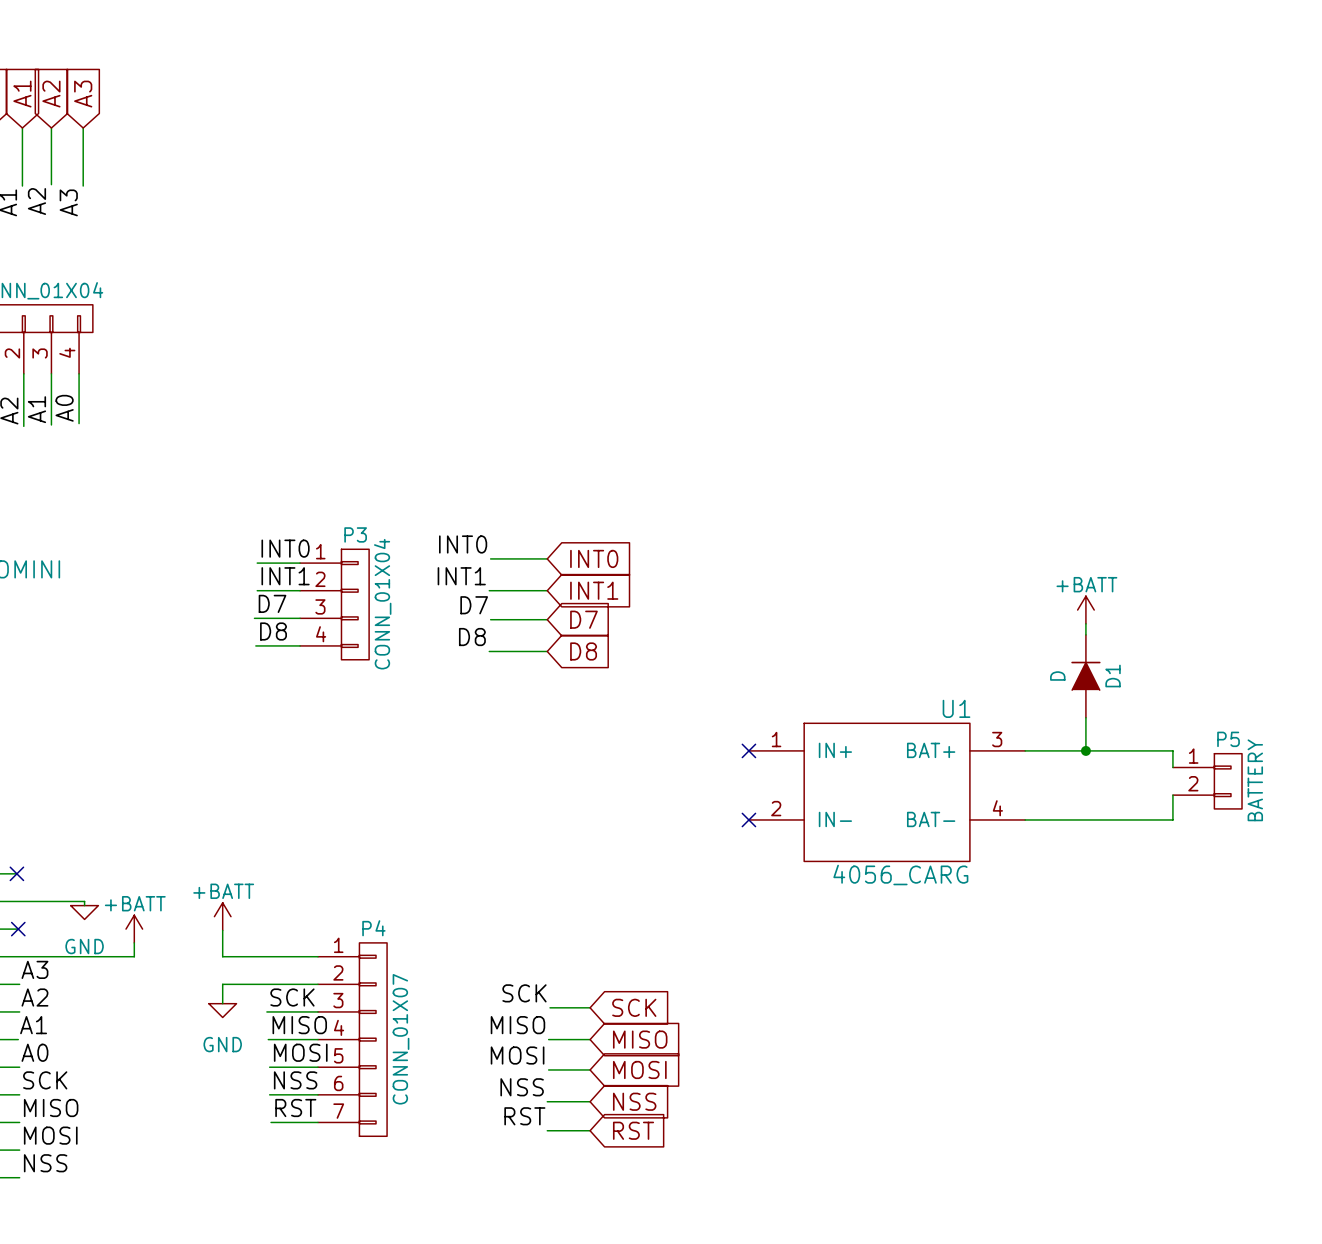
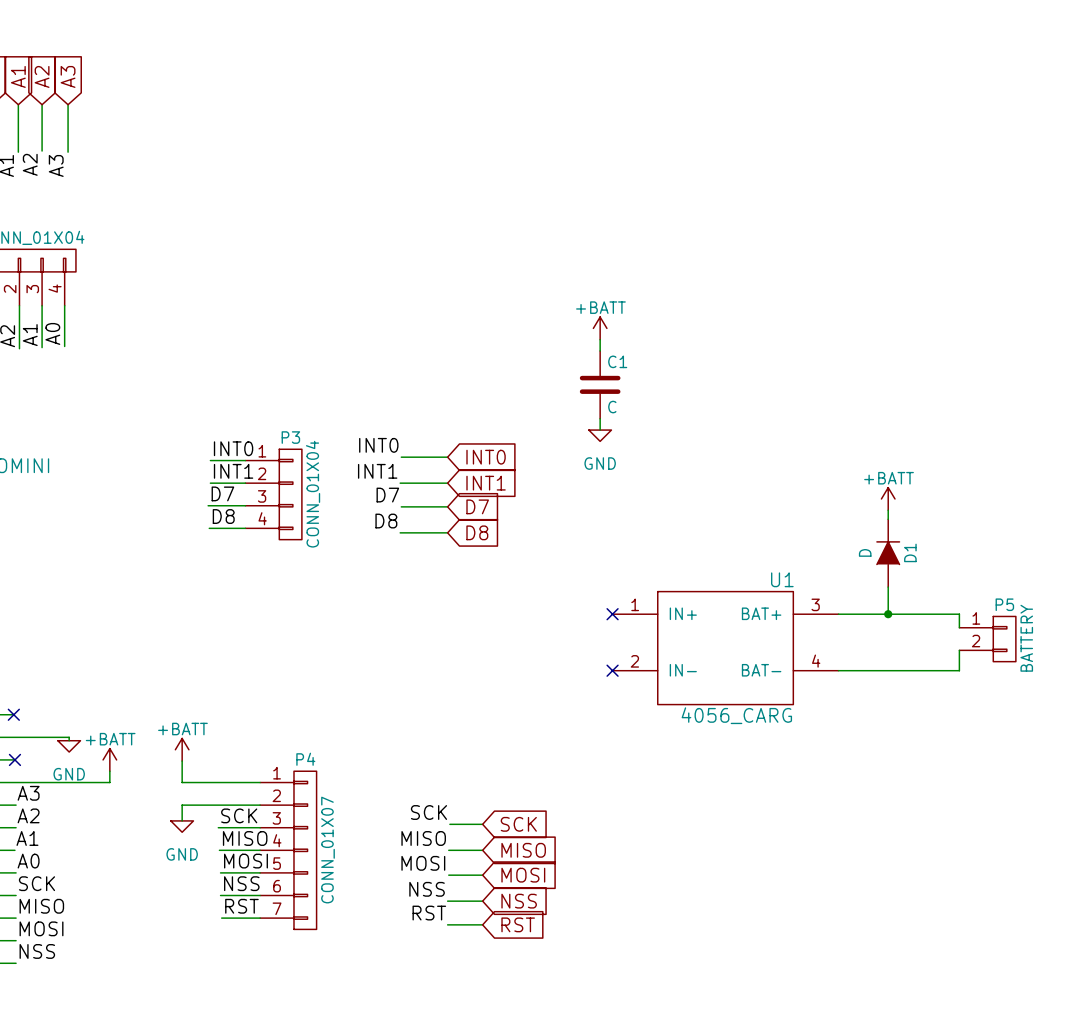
power symbol: none -> +BATT (600, 328)
wire: none -> (600, 339) (600, 350)
C1: none -> C (600, 384)
wire: none -> (600, 418) (600, 430)
power symbol: none -> GND (600, 435)

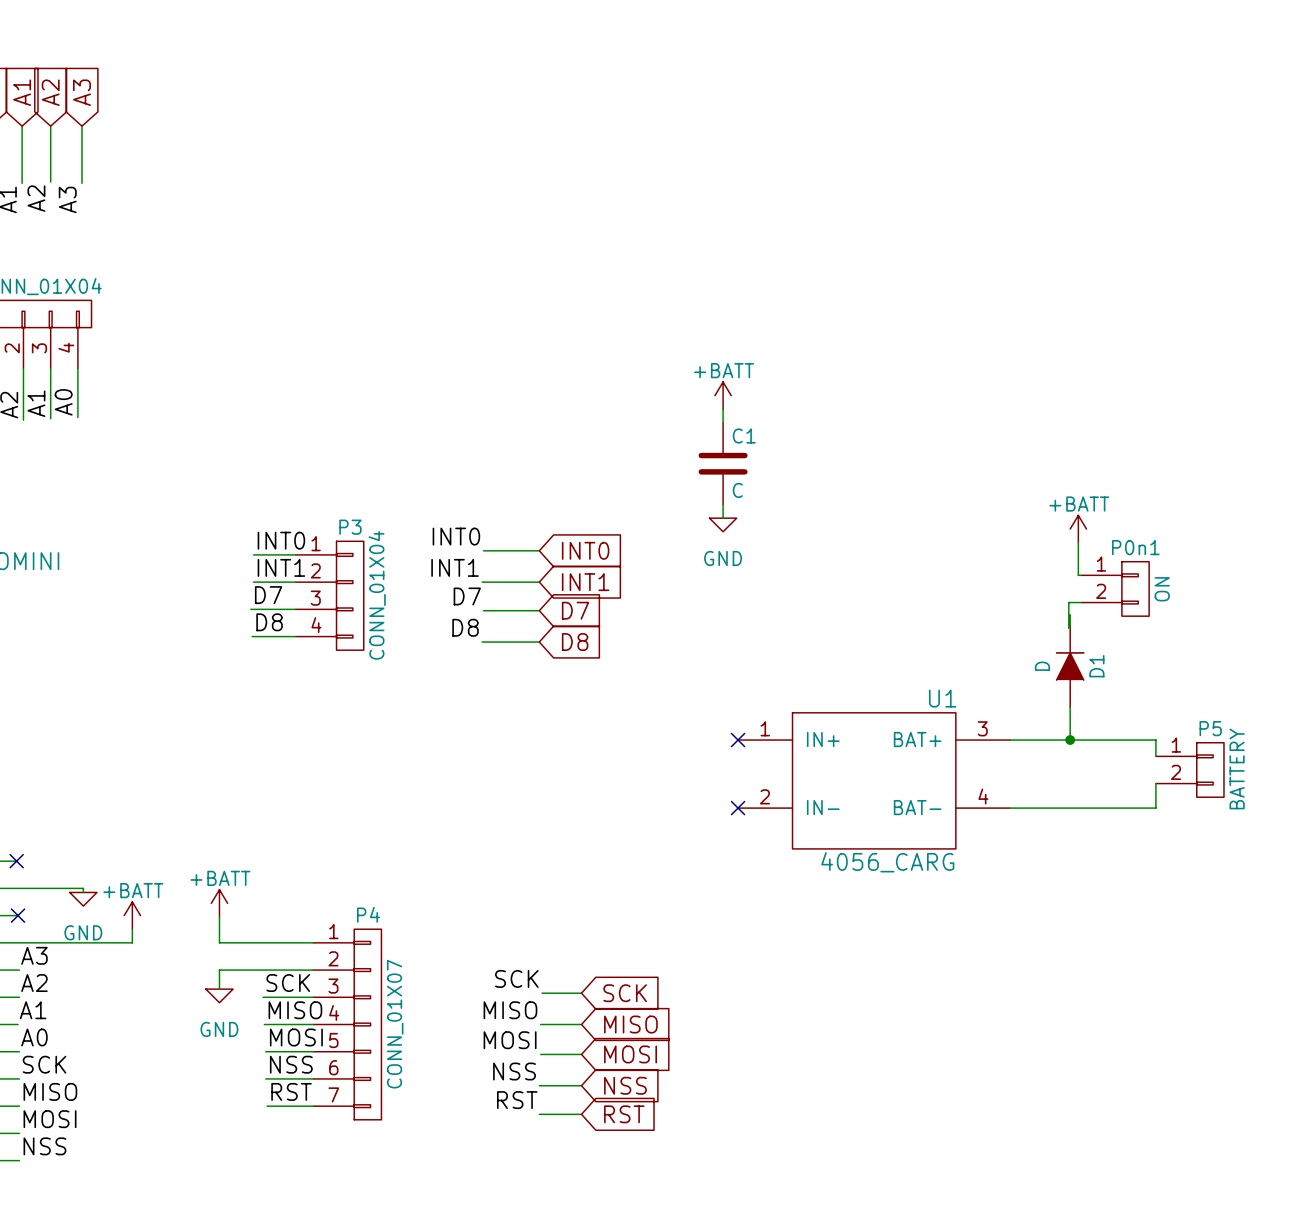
wire: none -> (1078, 542) (1078, 575) (1081, 575)
P0n1: none -> ON (1115, 588)
power symbol position: +BATT (888, 498) -> +BATT (1078, 529)
wire: none -> (1081, 602) (1068, 602) (1068, 628)

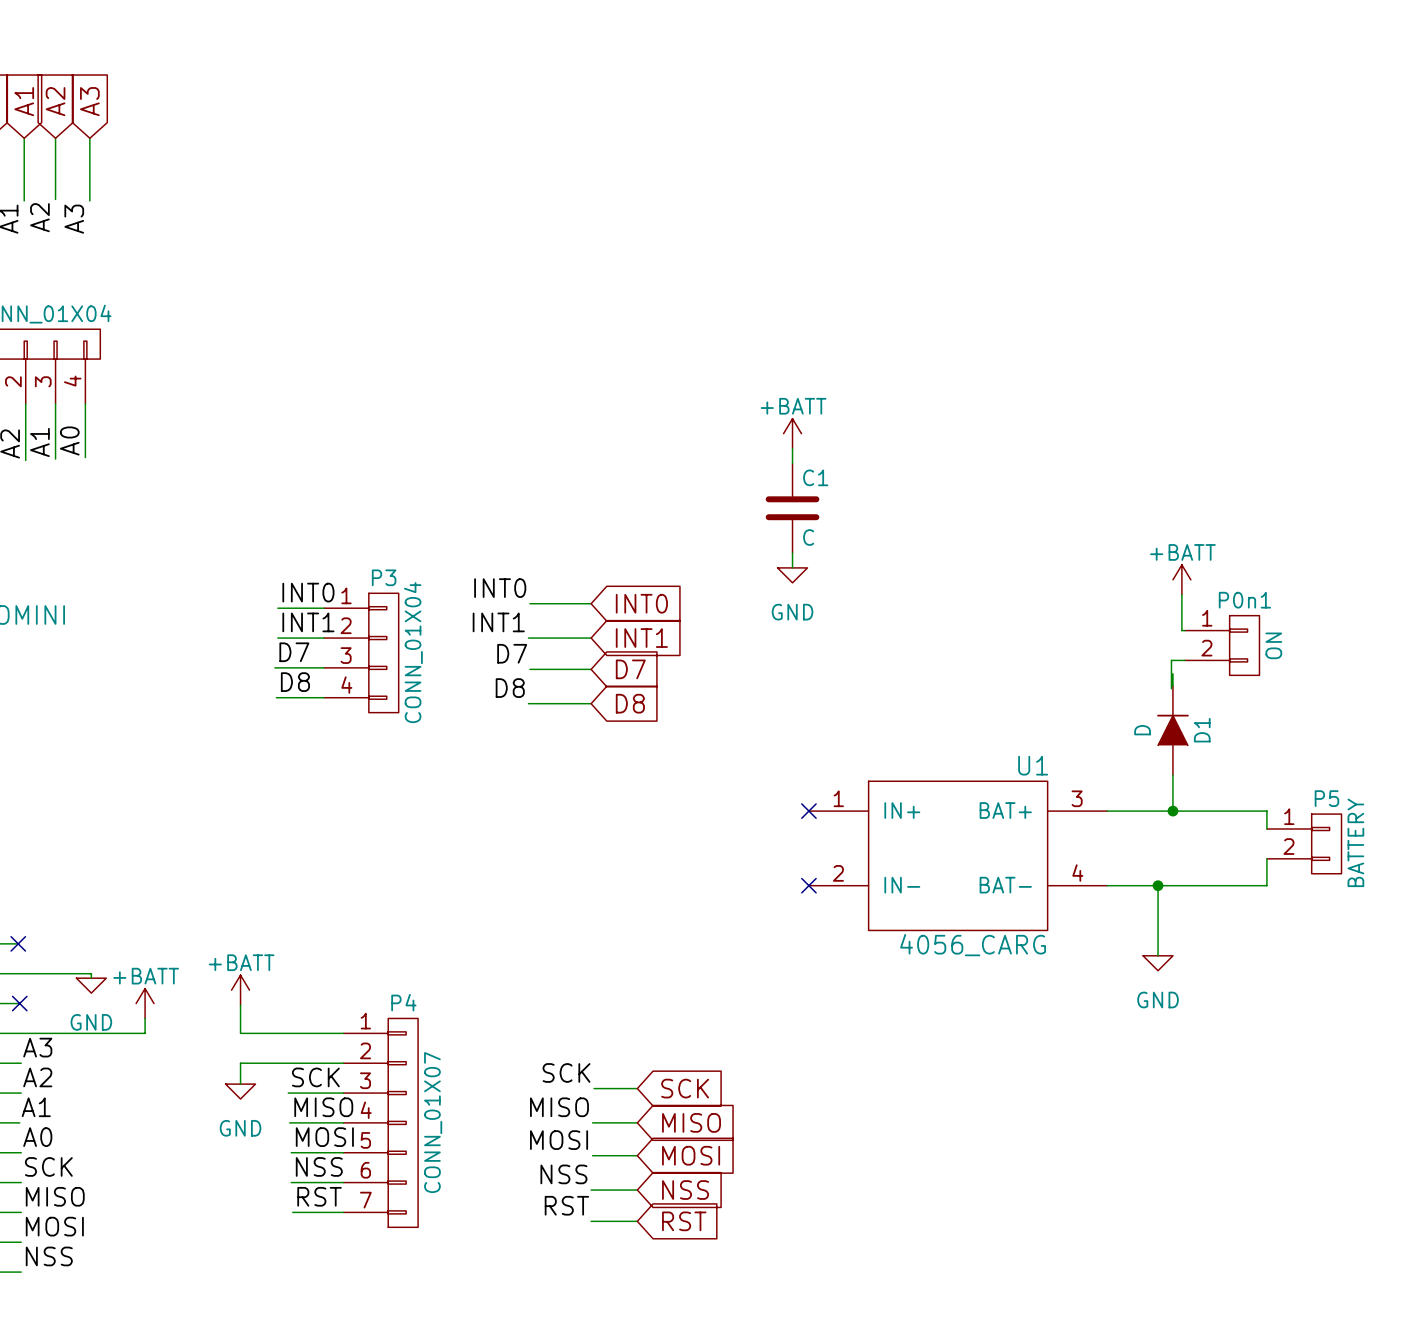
wire: none -> (1158, 885) (1158, 955)
junction: none -> (1158, 885)
power symbol: none -> GND (1158, 963)

